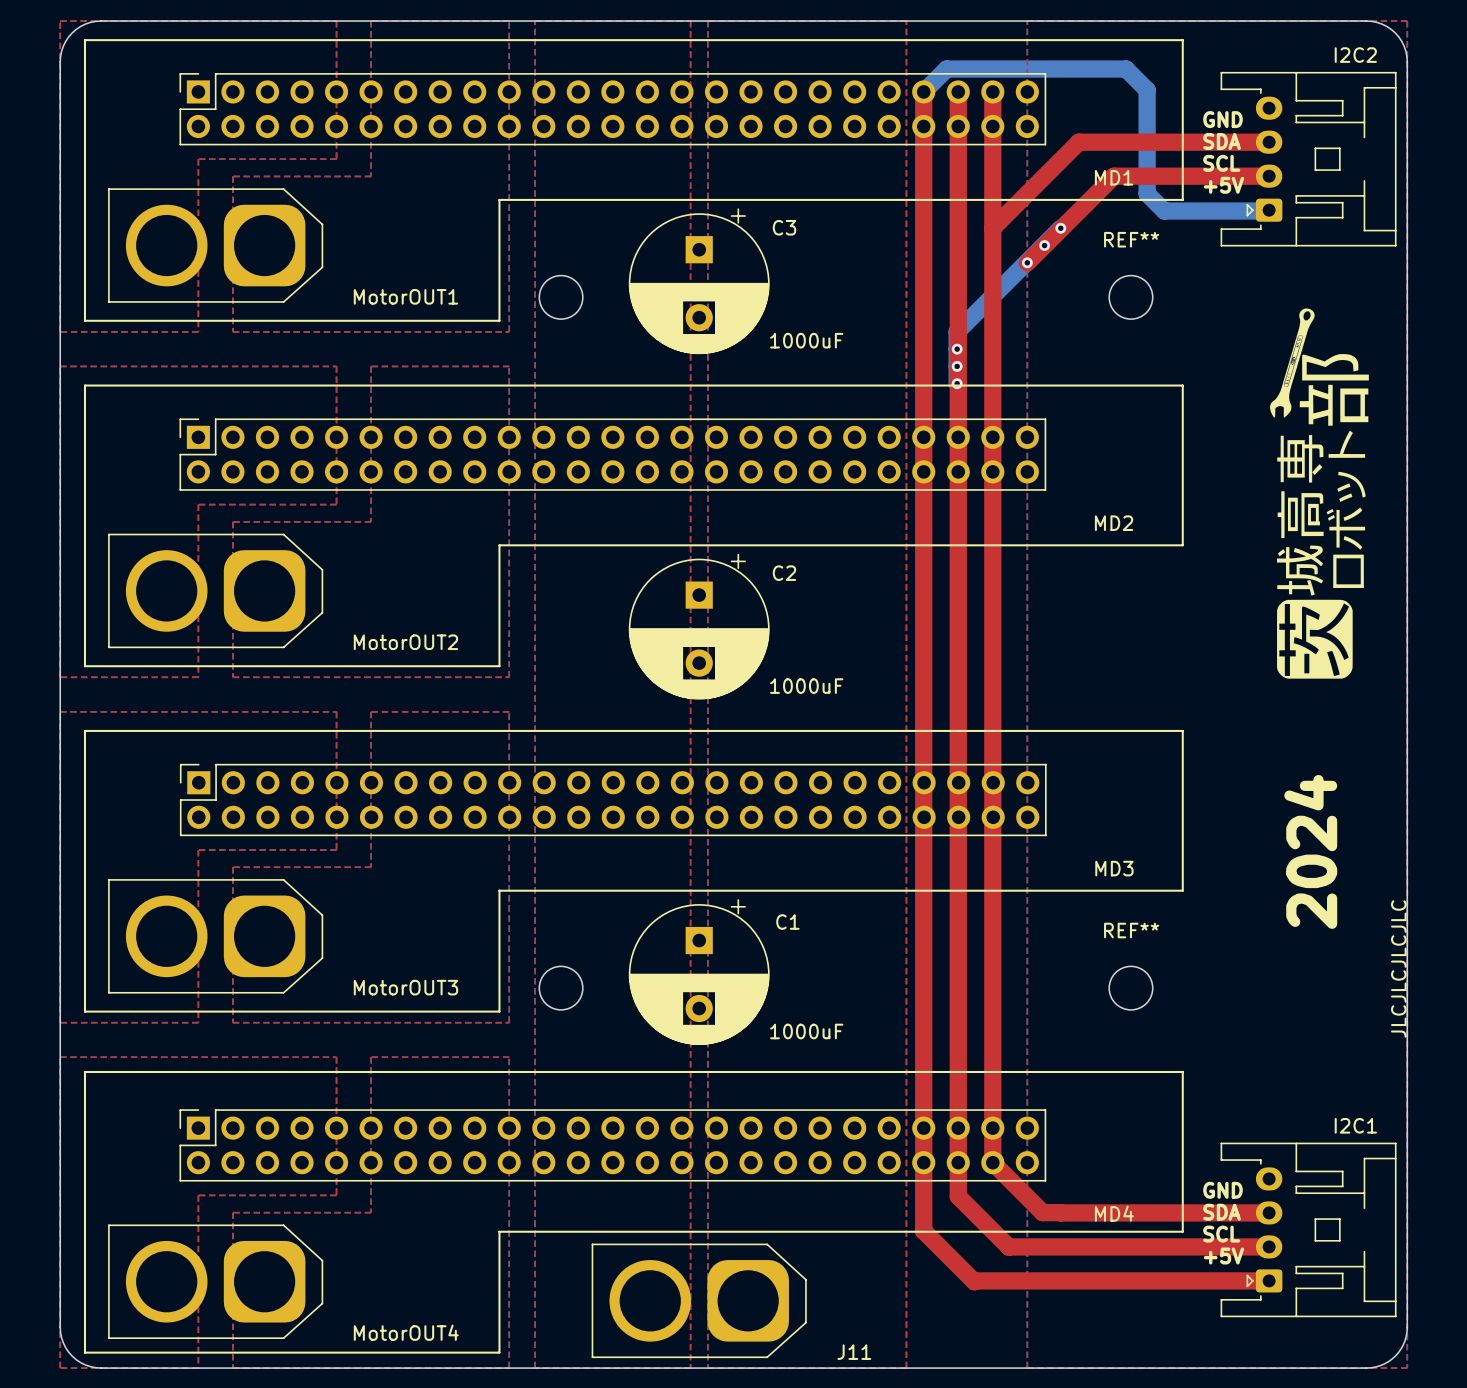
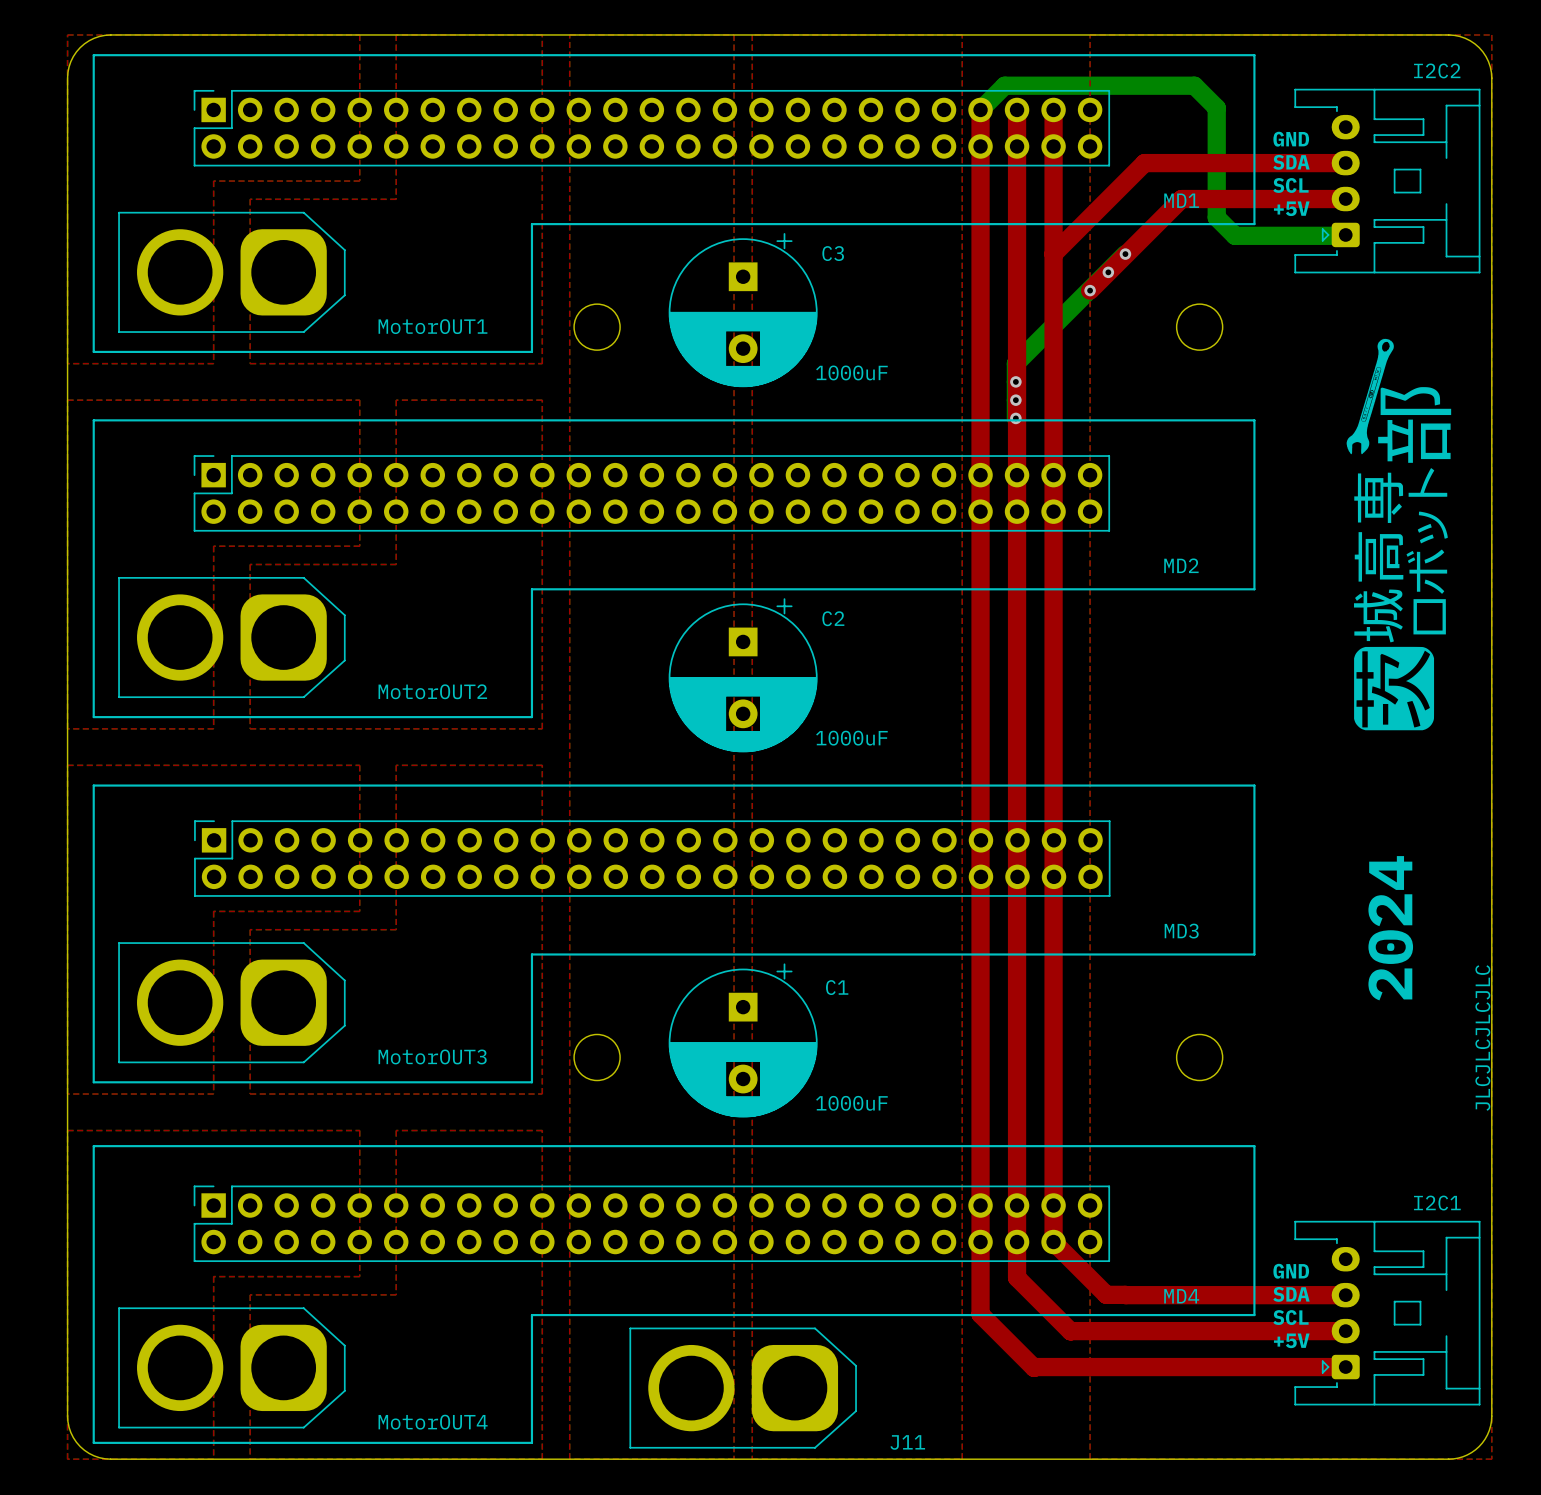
REF** name: REF** (1131, 239) -> none
REF** name: REF** (1131, 930) -> none

